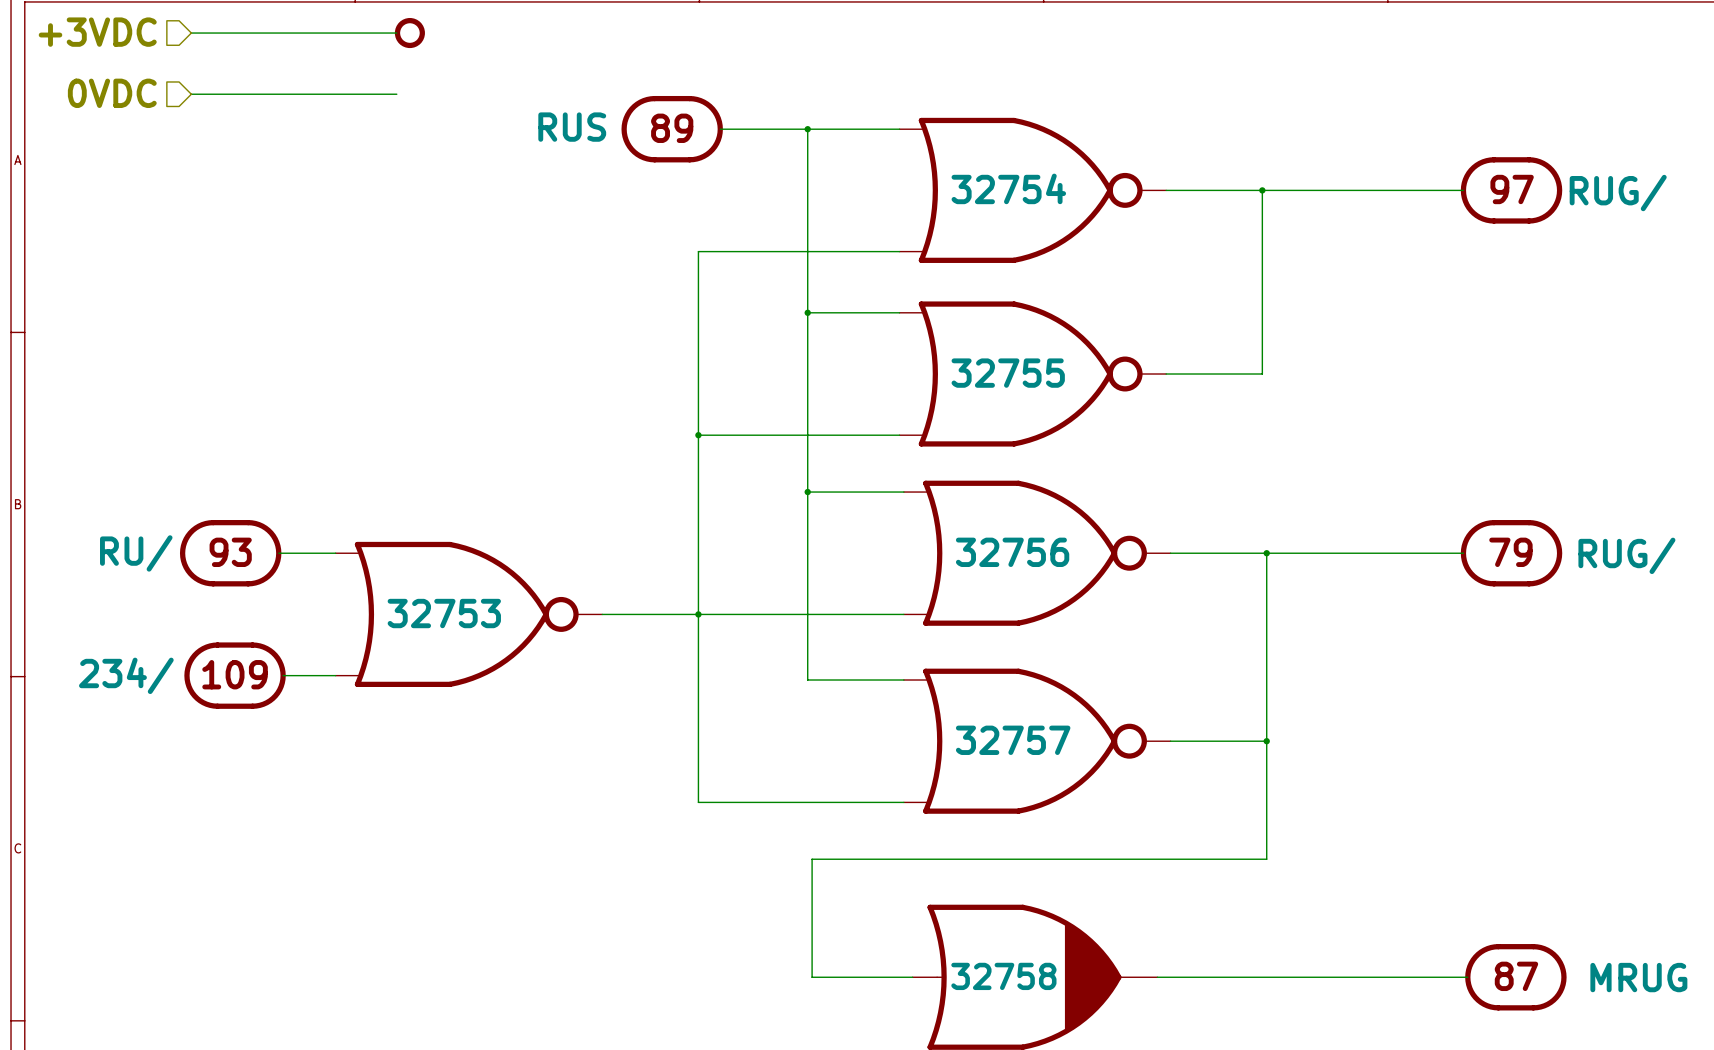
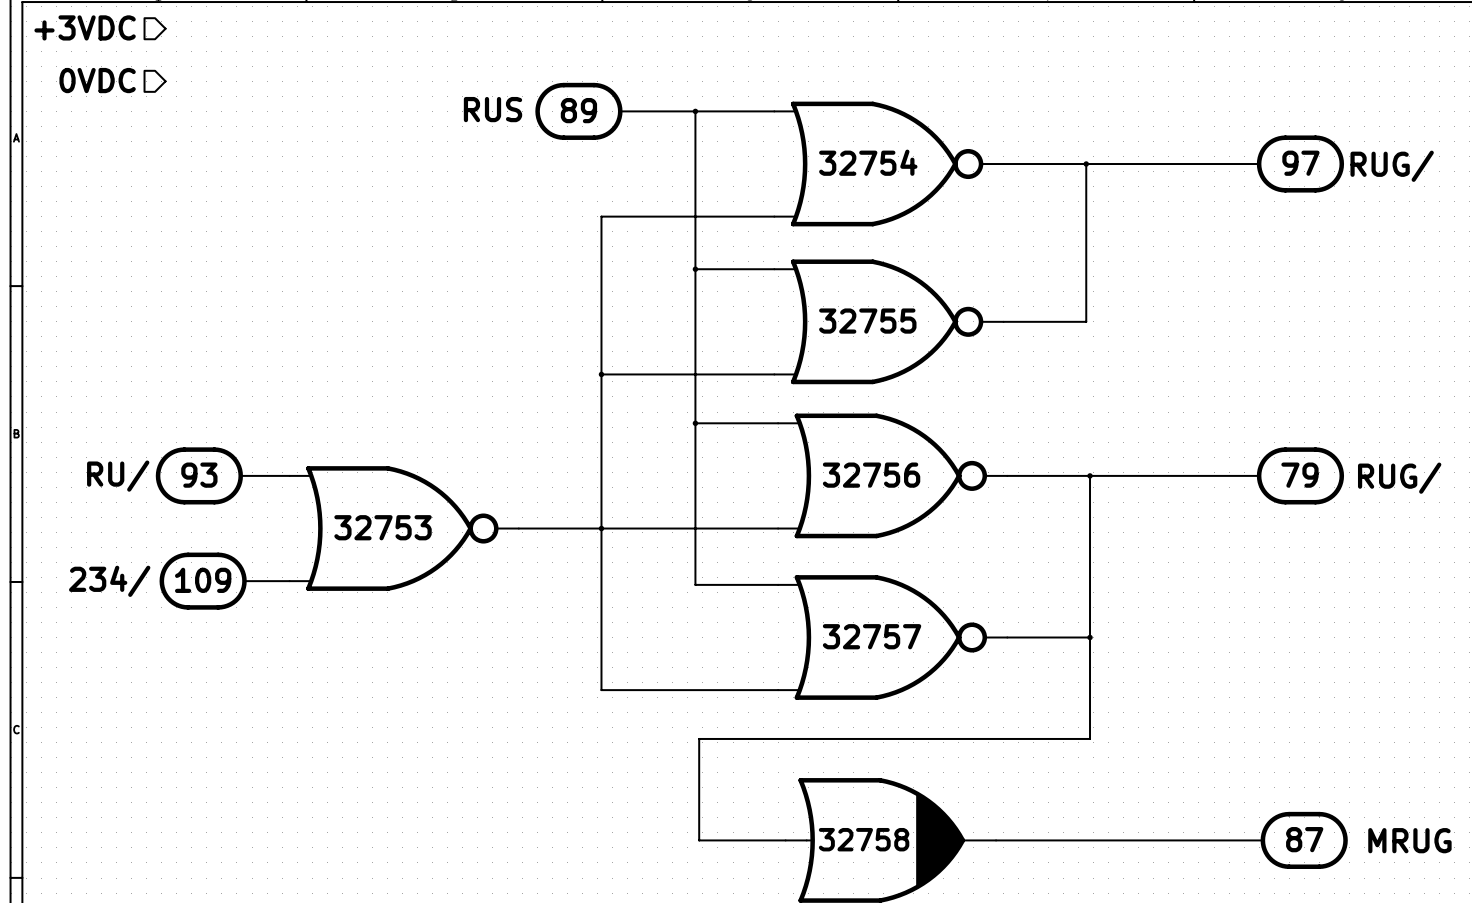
wire: (191, 33) (396, 33) -> none
part: (409, 33) -> none
wire: (191, 94) (396, 94) -> none

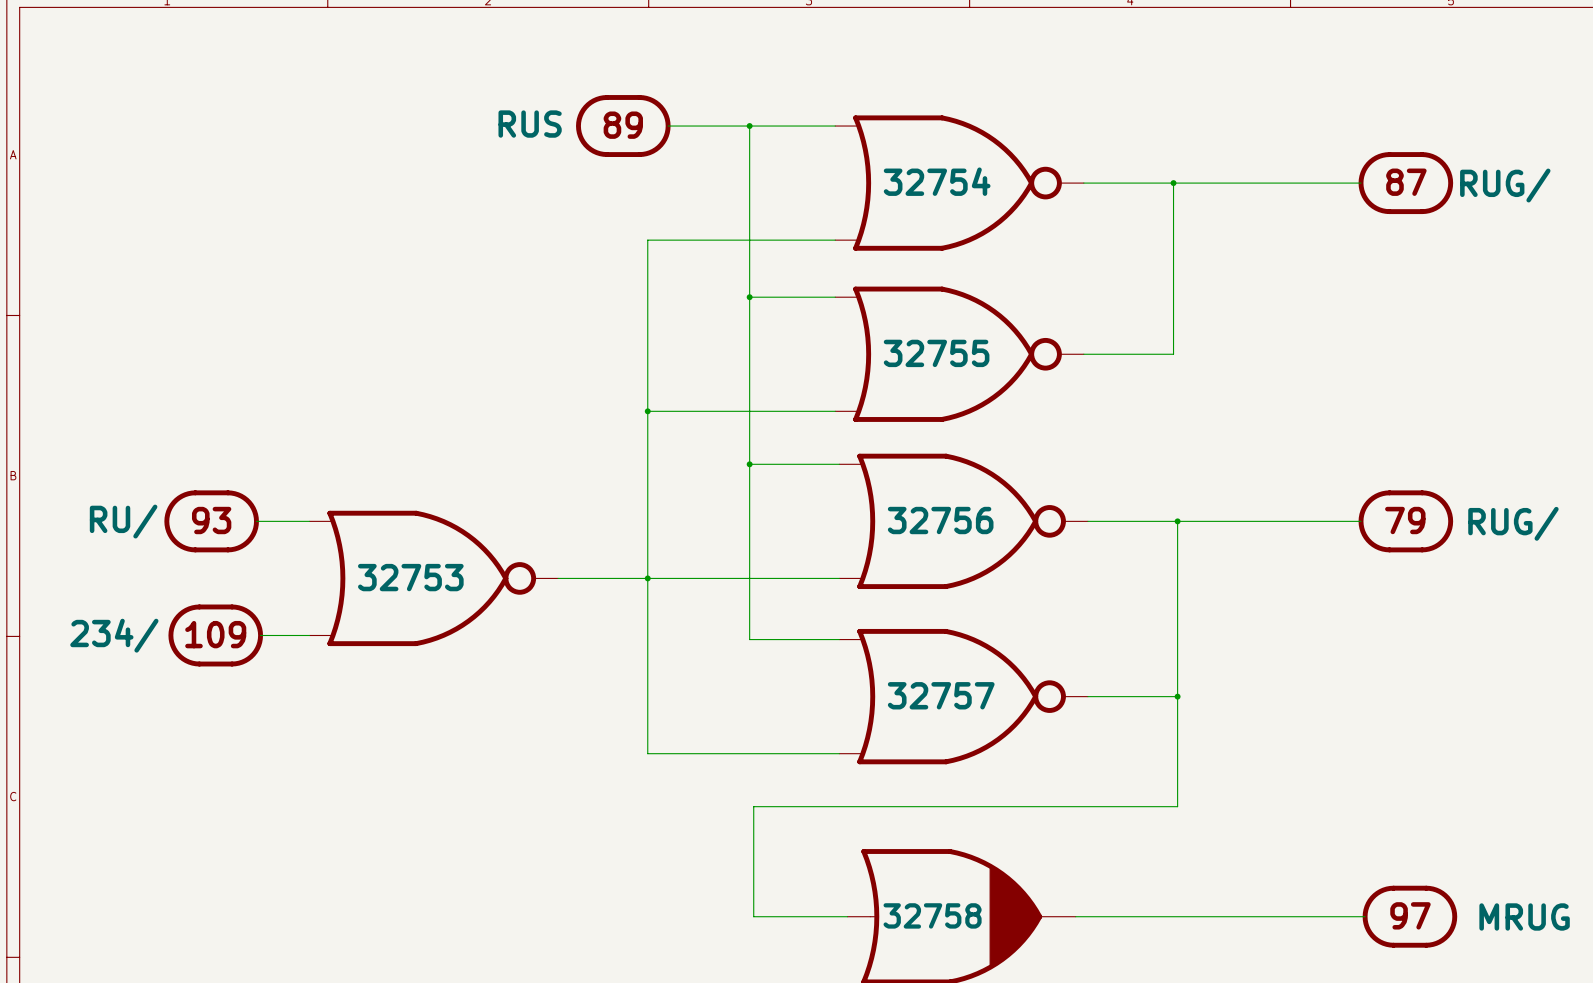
hierarchical label: +3VDC (85, 27) -> none
hierarchical label: 0VDC (97, 80) -> none
part text: 97 (1300, 163) -> 87 (1406, 182)
part text: 87 (1304, 839) -> 97 (1410, 915)

